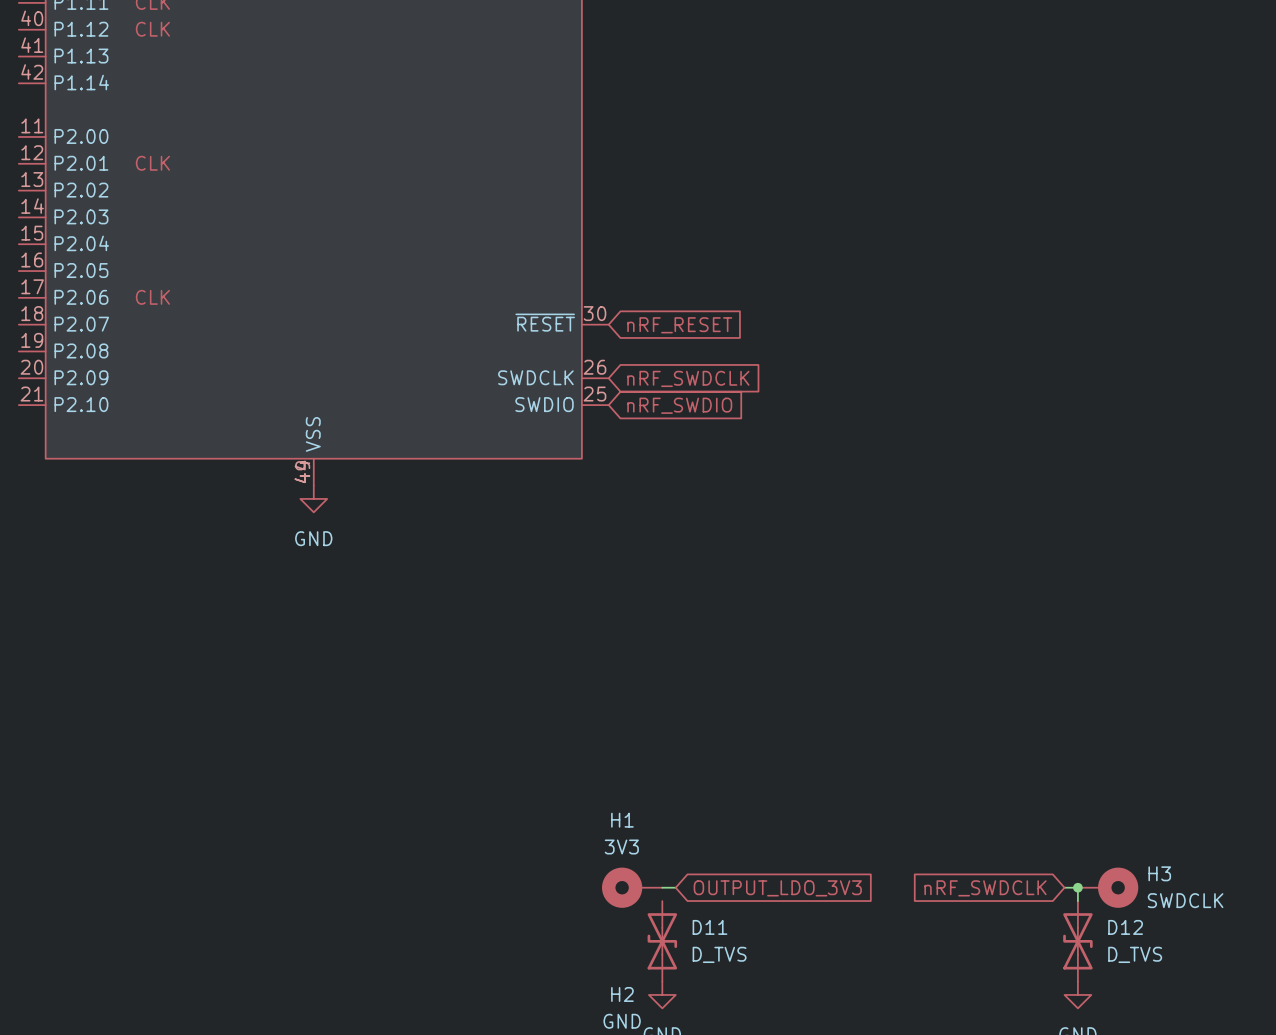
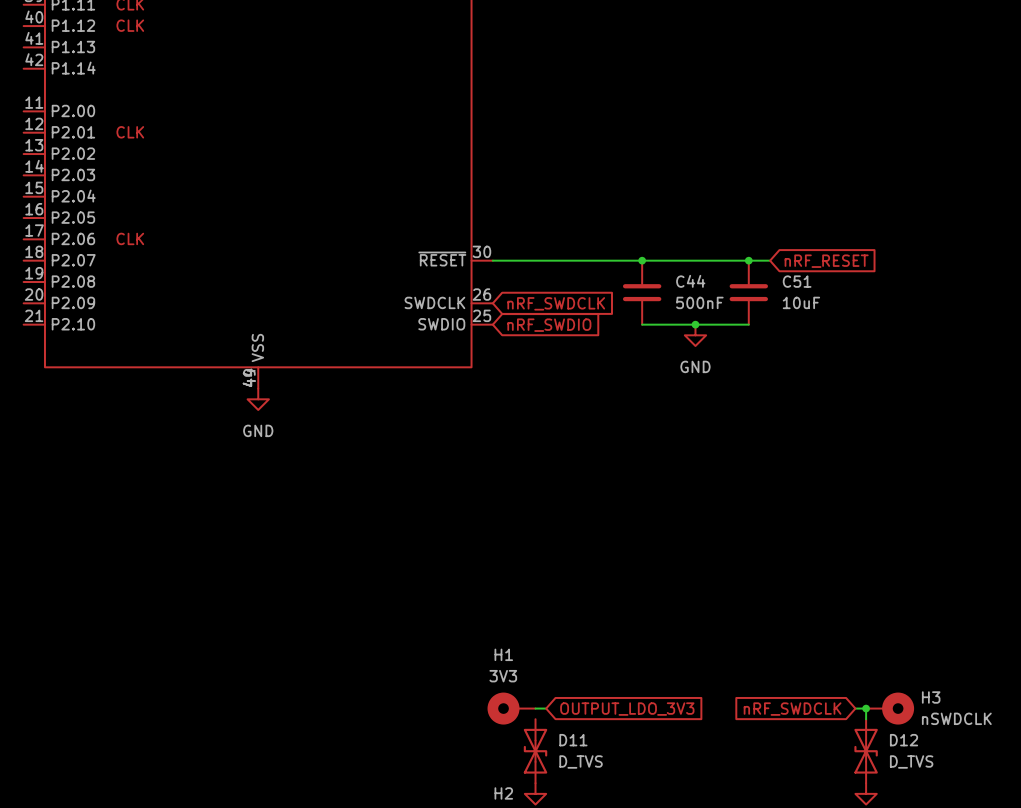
wire: none -> (492, 260) (770, 260)
junction: none -> (642, 260)
junction: none -> (748, 260)
global label: nRF_RESET (679, 325) -> none
global label: none -> nRF_RESET (826, 261)
C44: none -> 500nF (642, 292)
C51: none -> 10uF (748, 292)
wire: none -> (642, 324) (748, 324)
junction: none -> (695, 324)
power symbol: none -> GND (695, 335)
H3 value: SWDCLK (1185, 900) -> nSWDCLK (956, 718)

